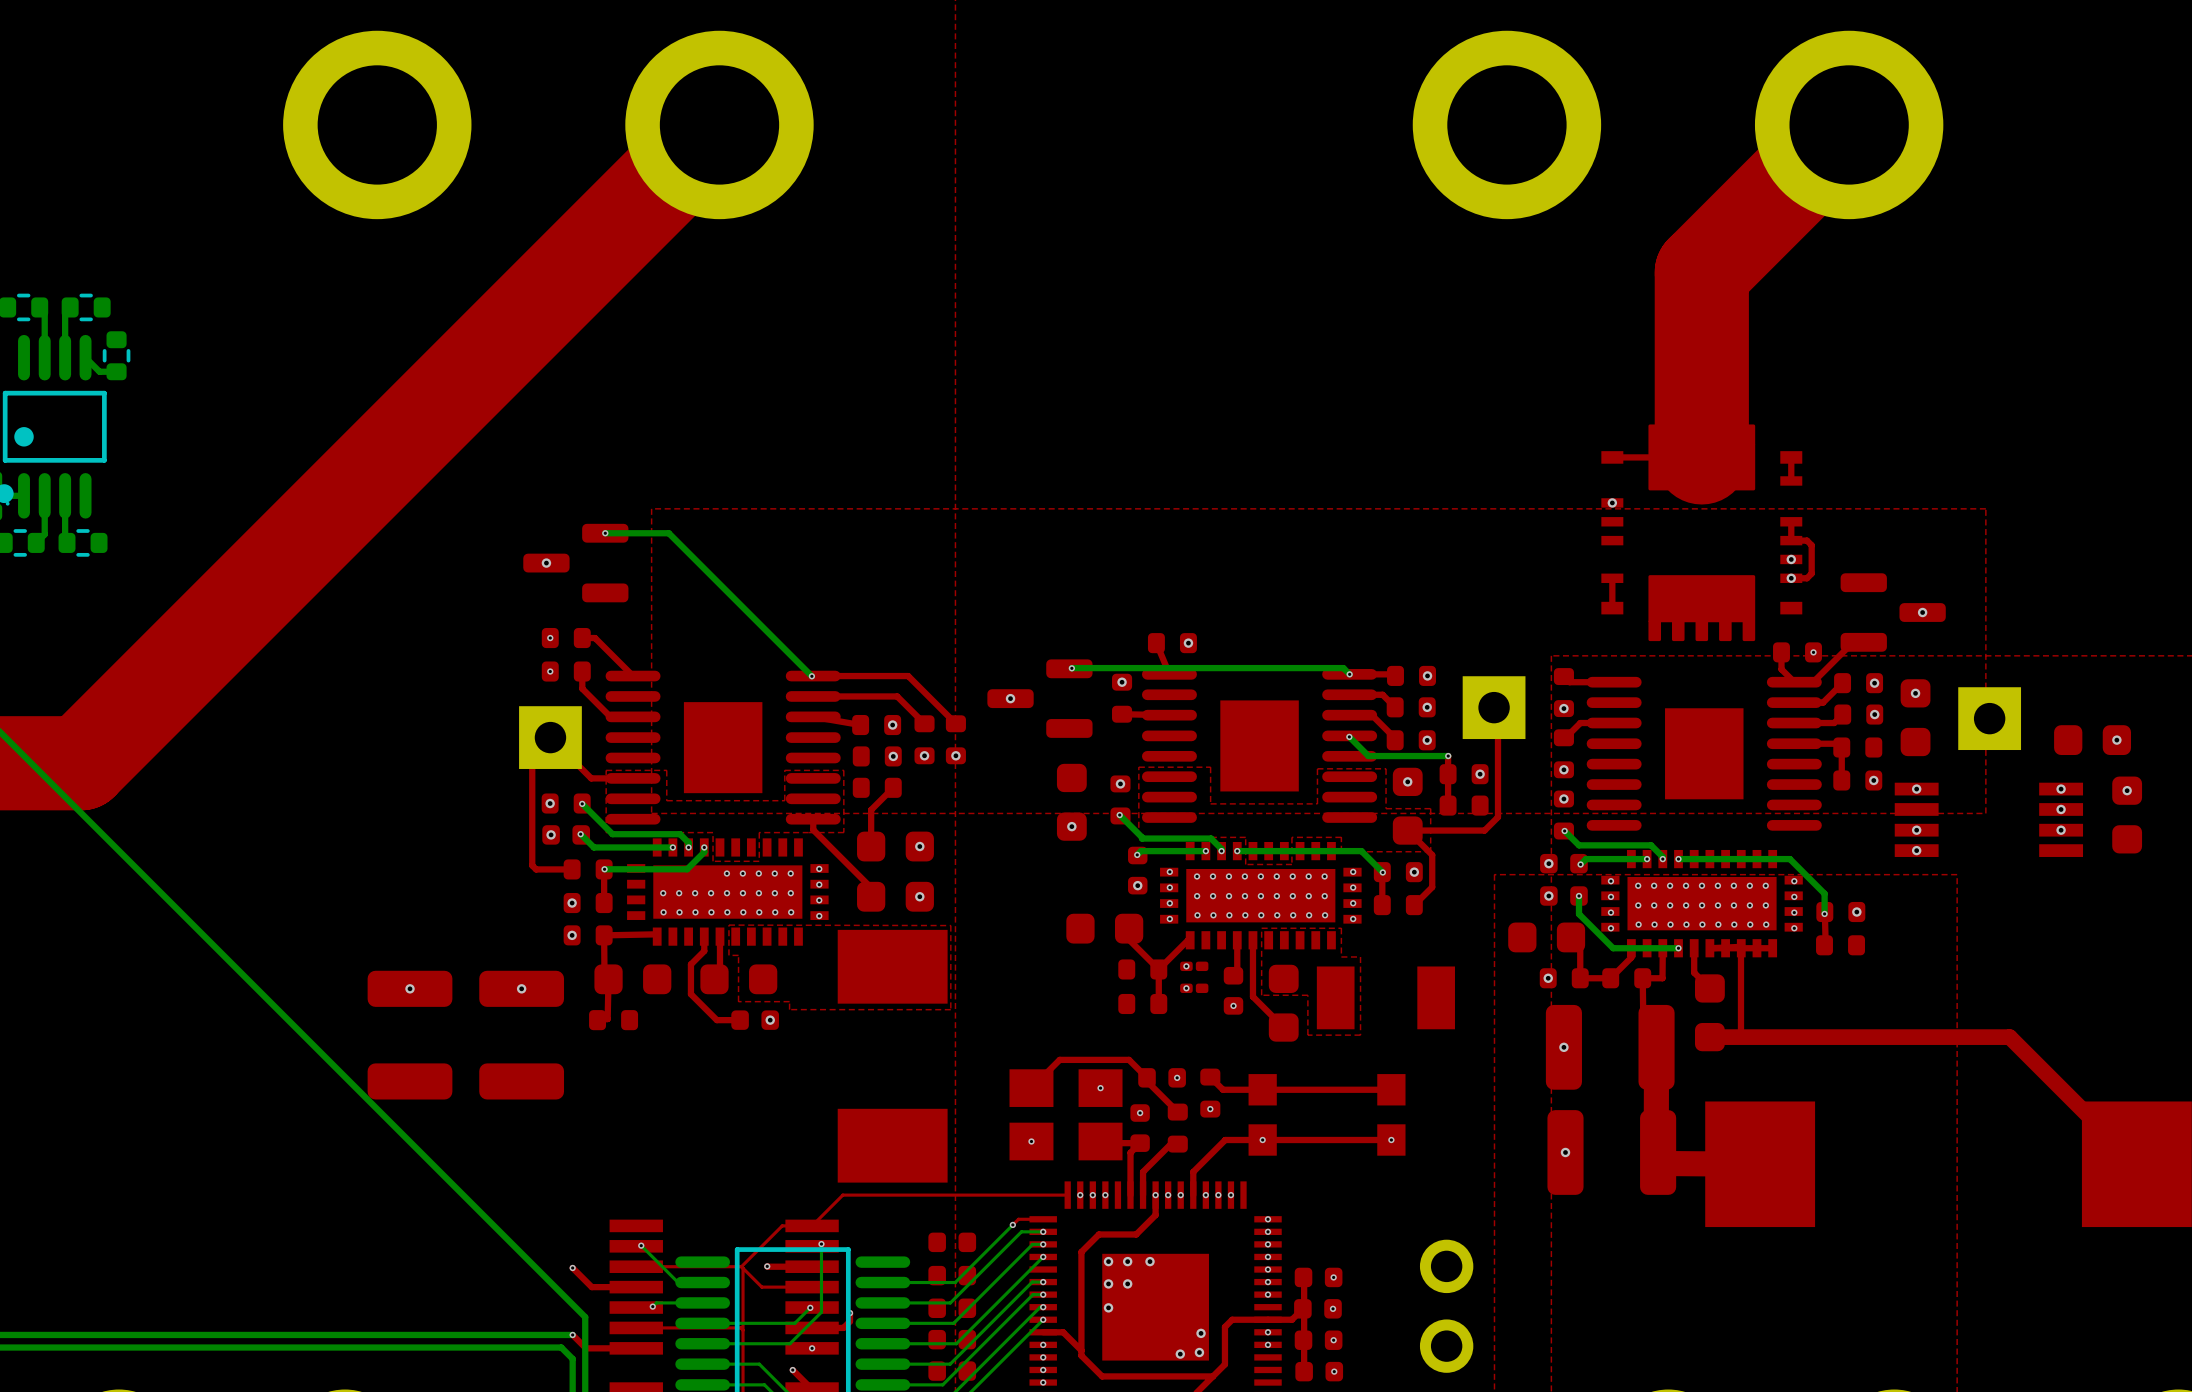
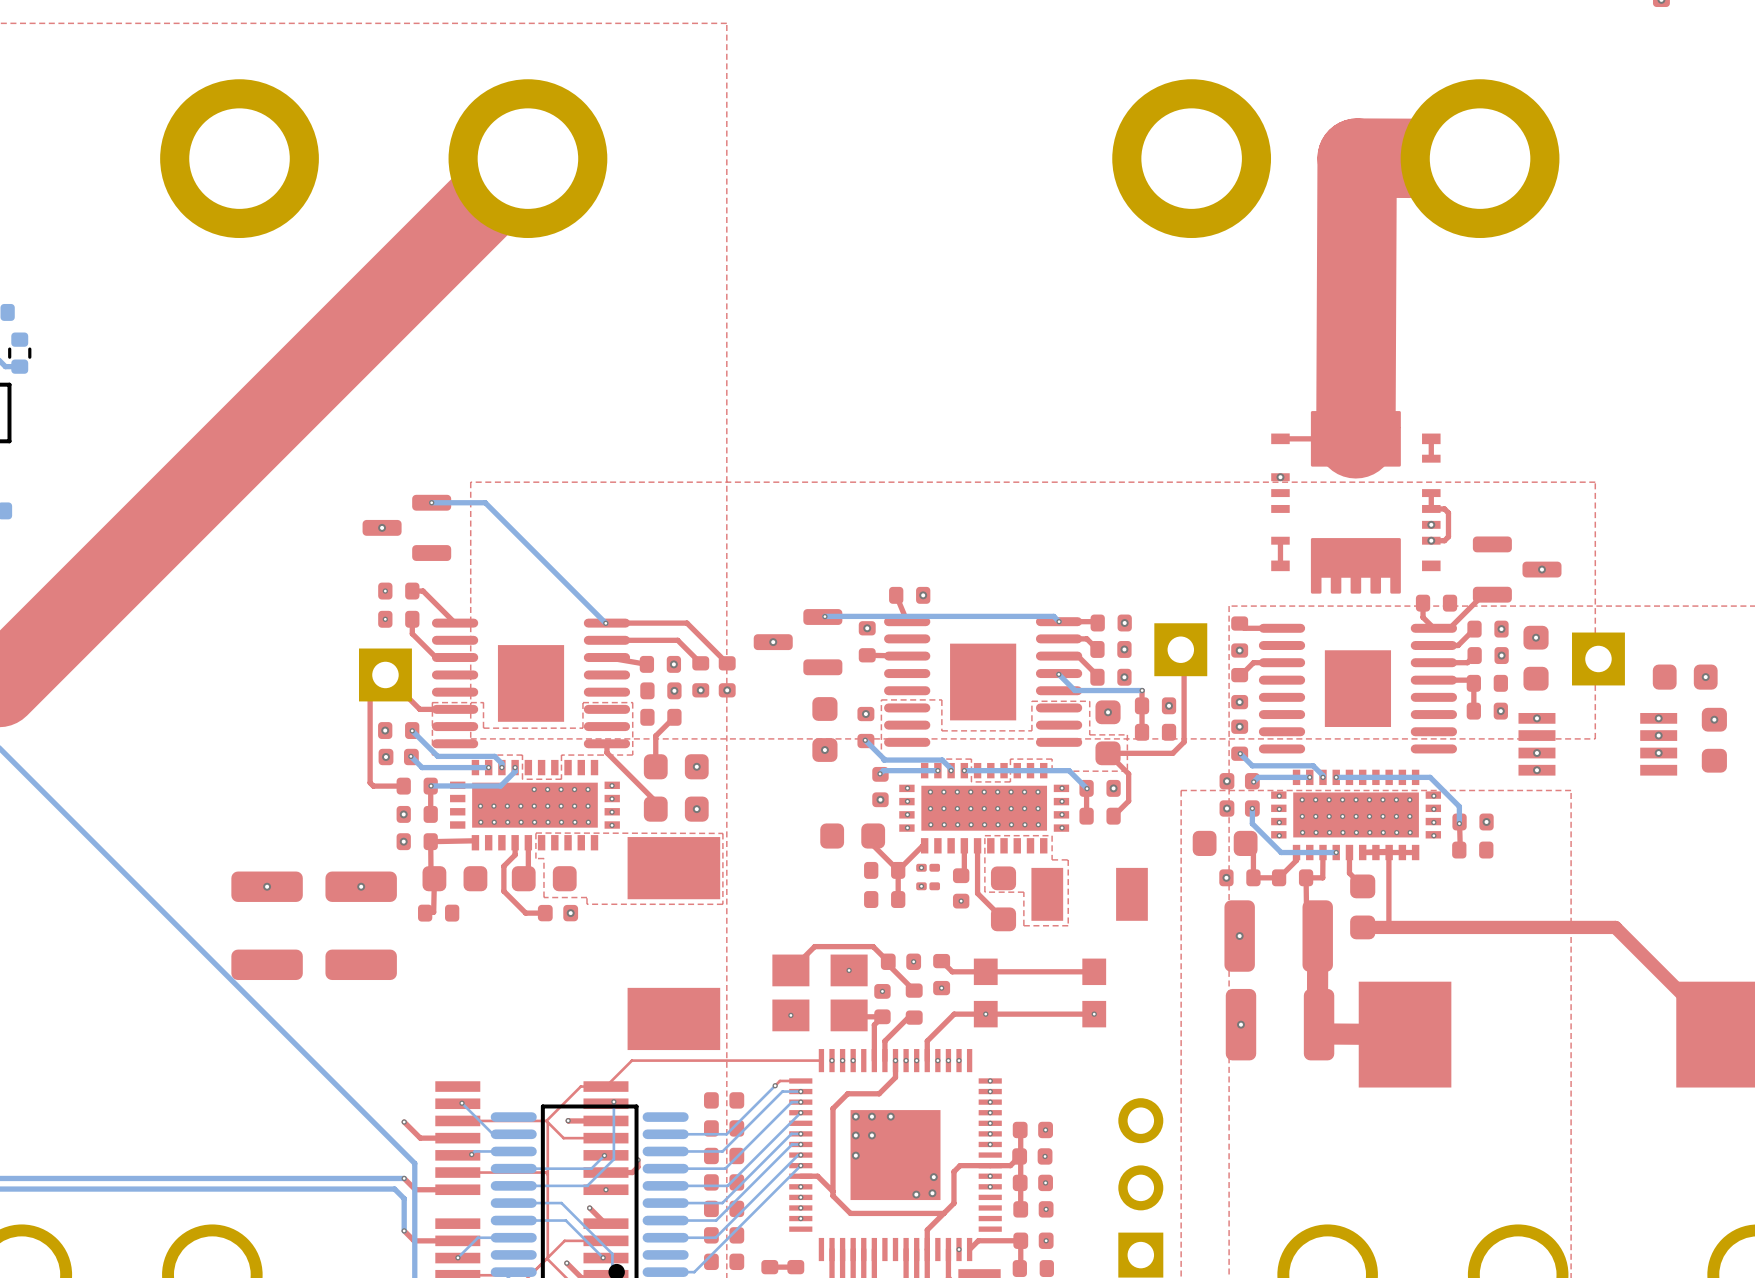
top track: (1849, 124) (1701, 272) (1701, 457) -> (1480, 158) (1357, 158) (1355, 438)
via: (1813, 652) -> none

